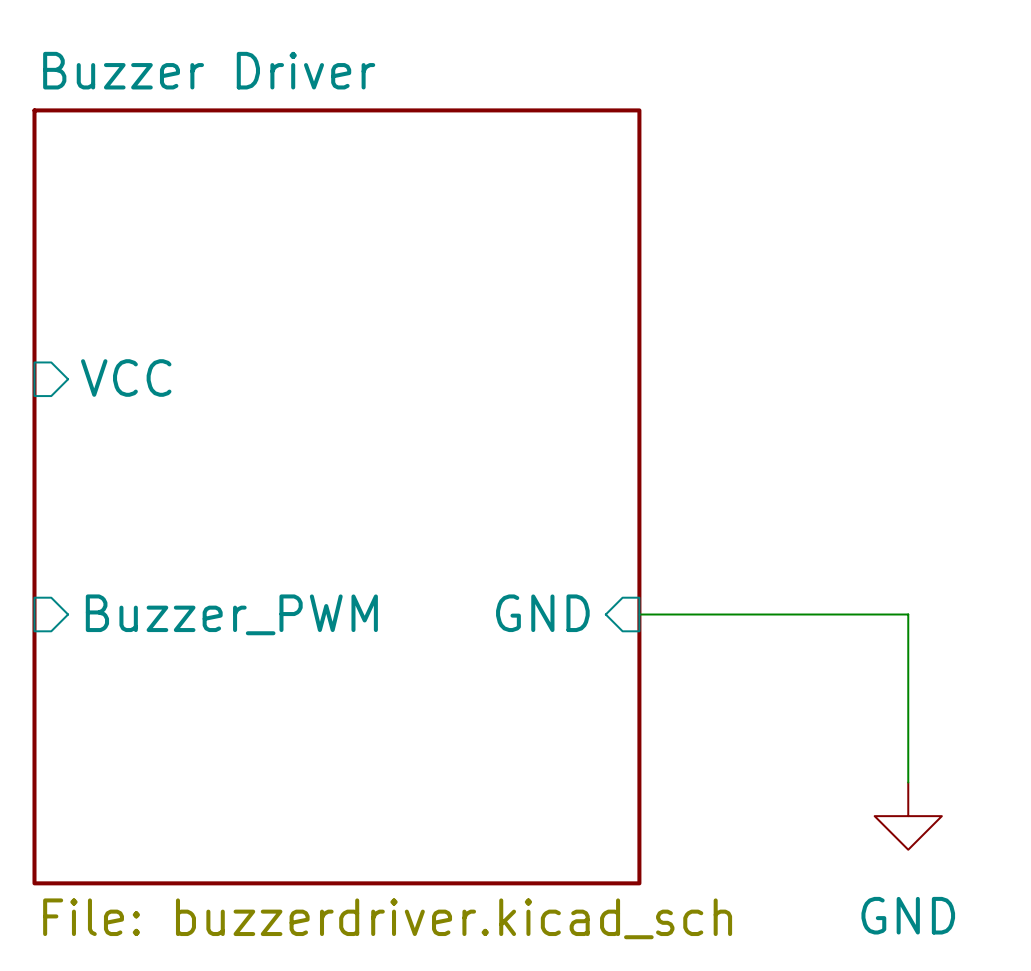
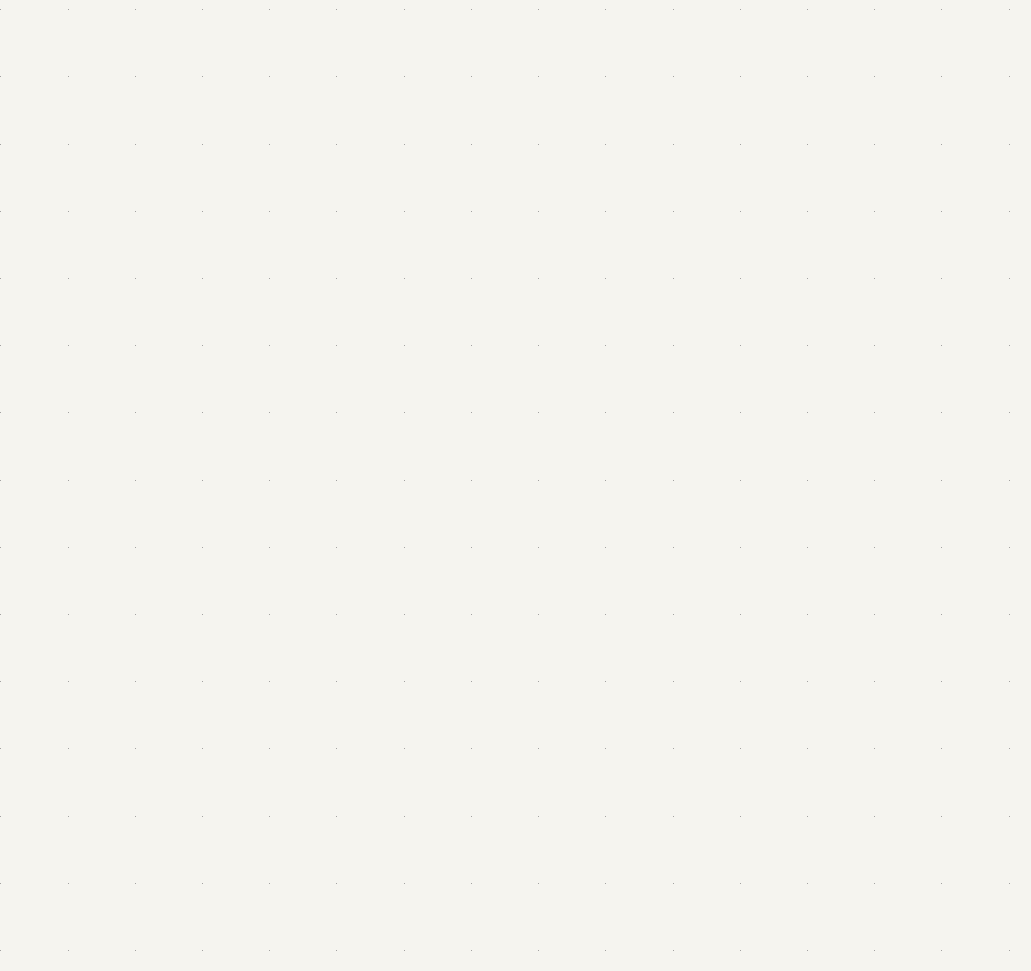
sheet pin: VCC (126, 378) -> none
sheet Buzzer Driver: File: buzzerdriver.kicad_sch (336, 496) -> none
sheet pin: GND (542, 613) -> none
sheet pin: Buzzer_PWM (231, 614) -> none
wire: (639, 614) (908, 614) (908, 782) -> none
power symbol: GND (908, 816) -> none

